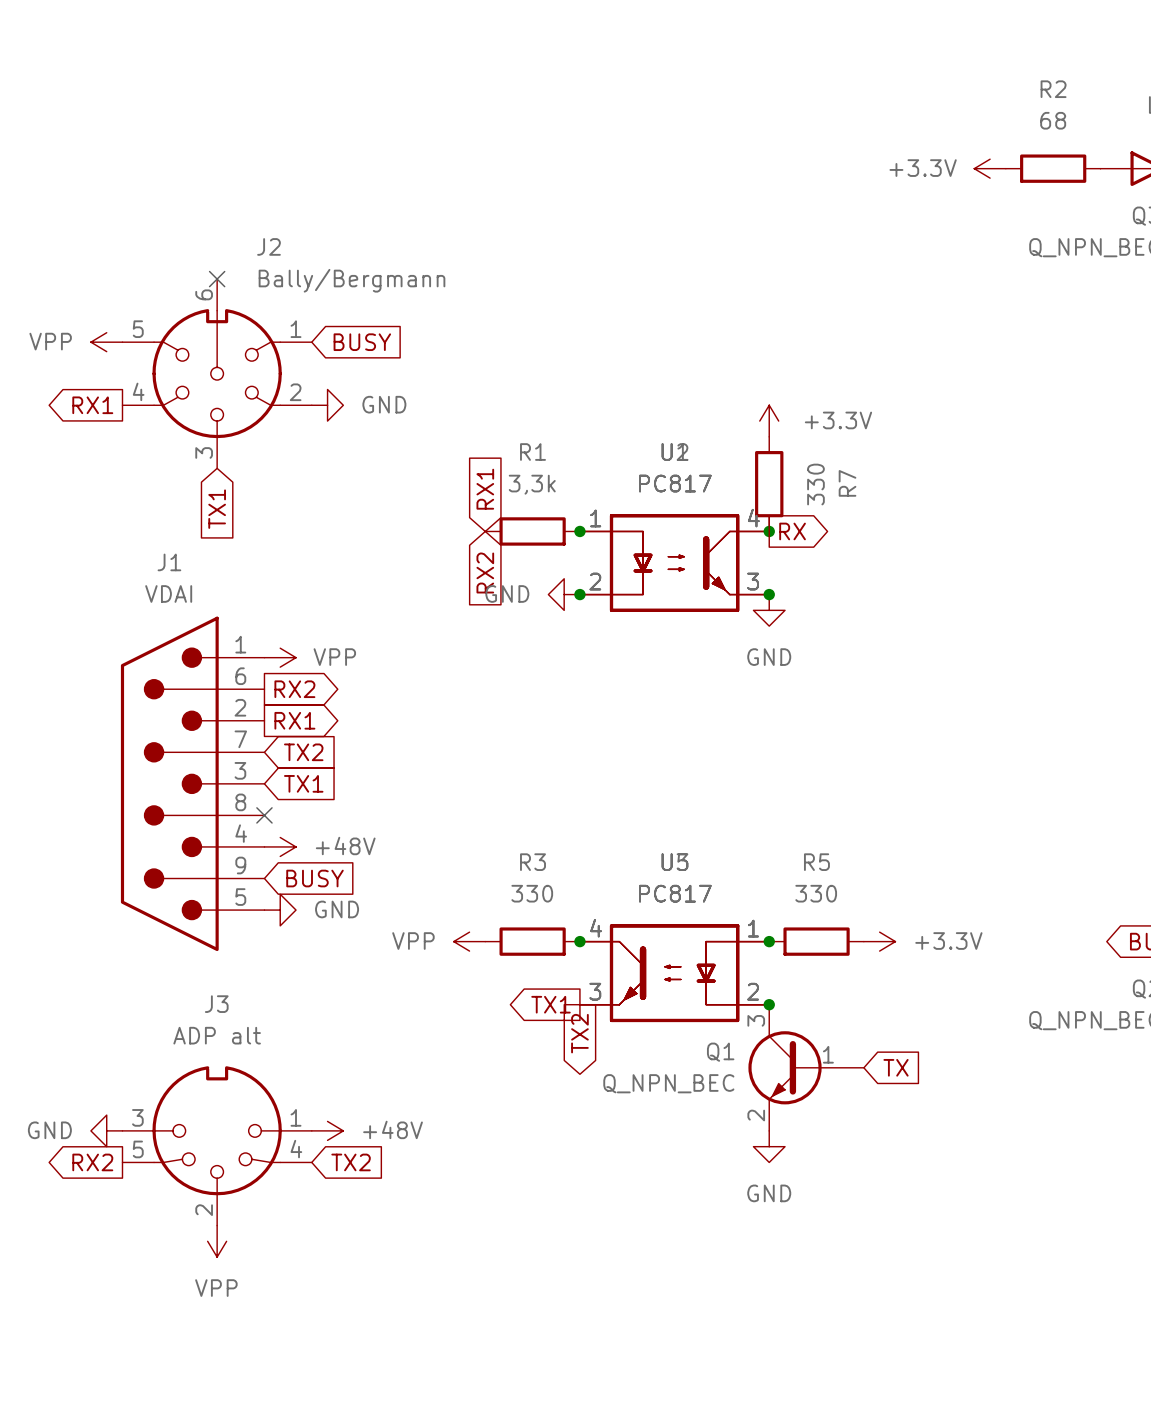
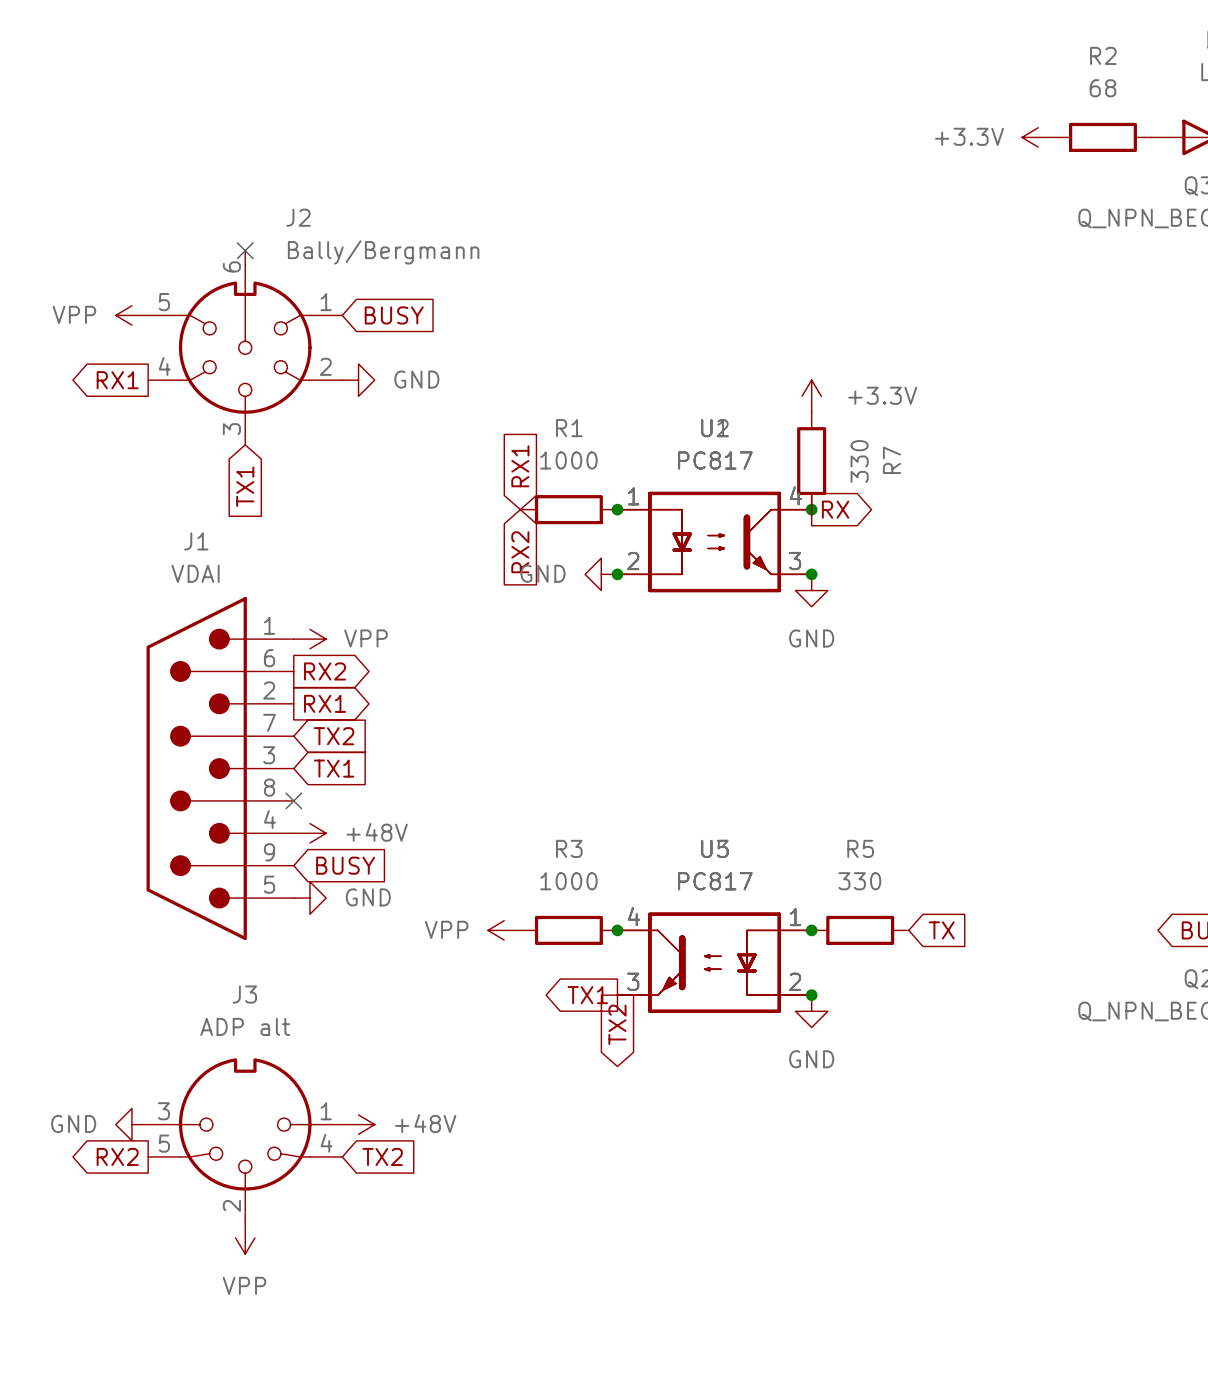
R1 value: 3,3k (532, 484) -> 1000 (568, 460)
R3 value: 330 (532, 893) -> 1000 (568, 881)
power symbol: +3.3V (879, 941) -> none
Q1: Q_NPN_BEC (806, 1067) -> none
global label position: TX (896, 1067) -> TX (941, 930)
power symbol position: GND (769, 1146) -> GND (811, 1011)

